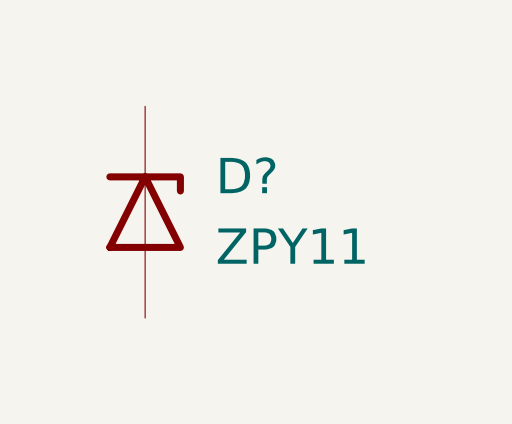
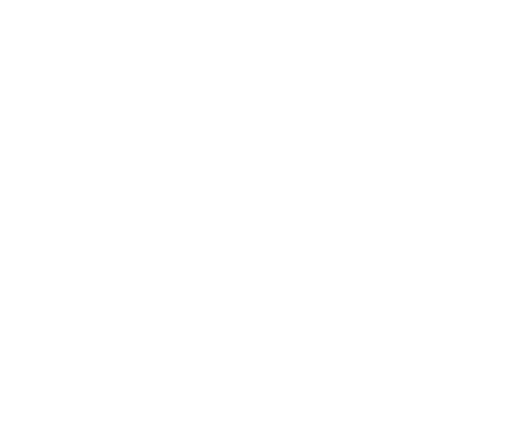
D?: ZPY11 (145, 212) -> none

